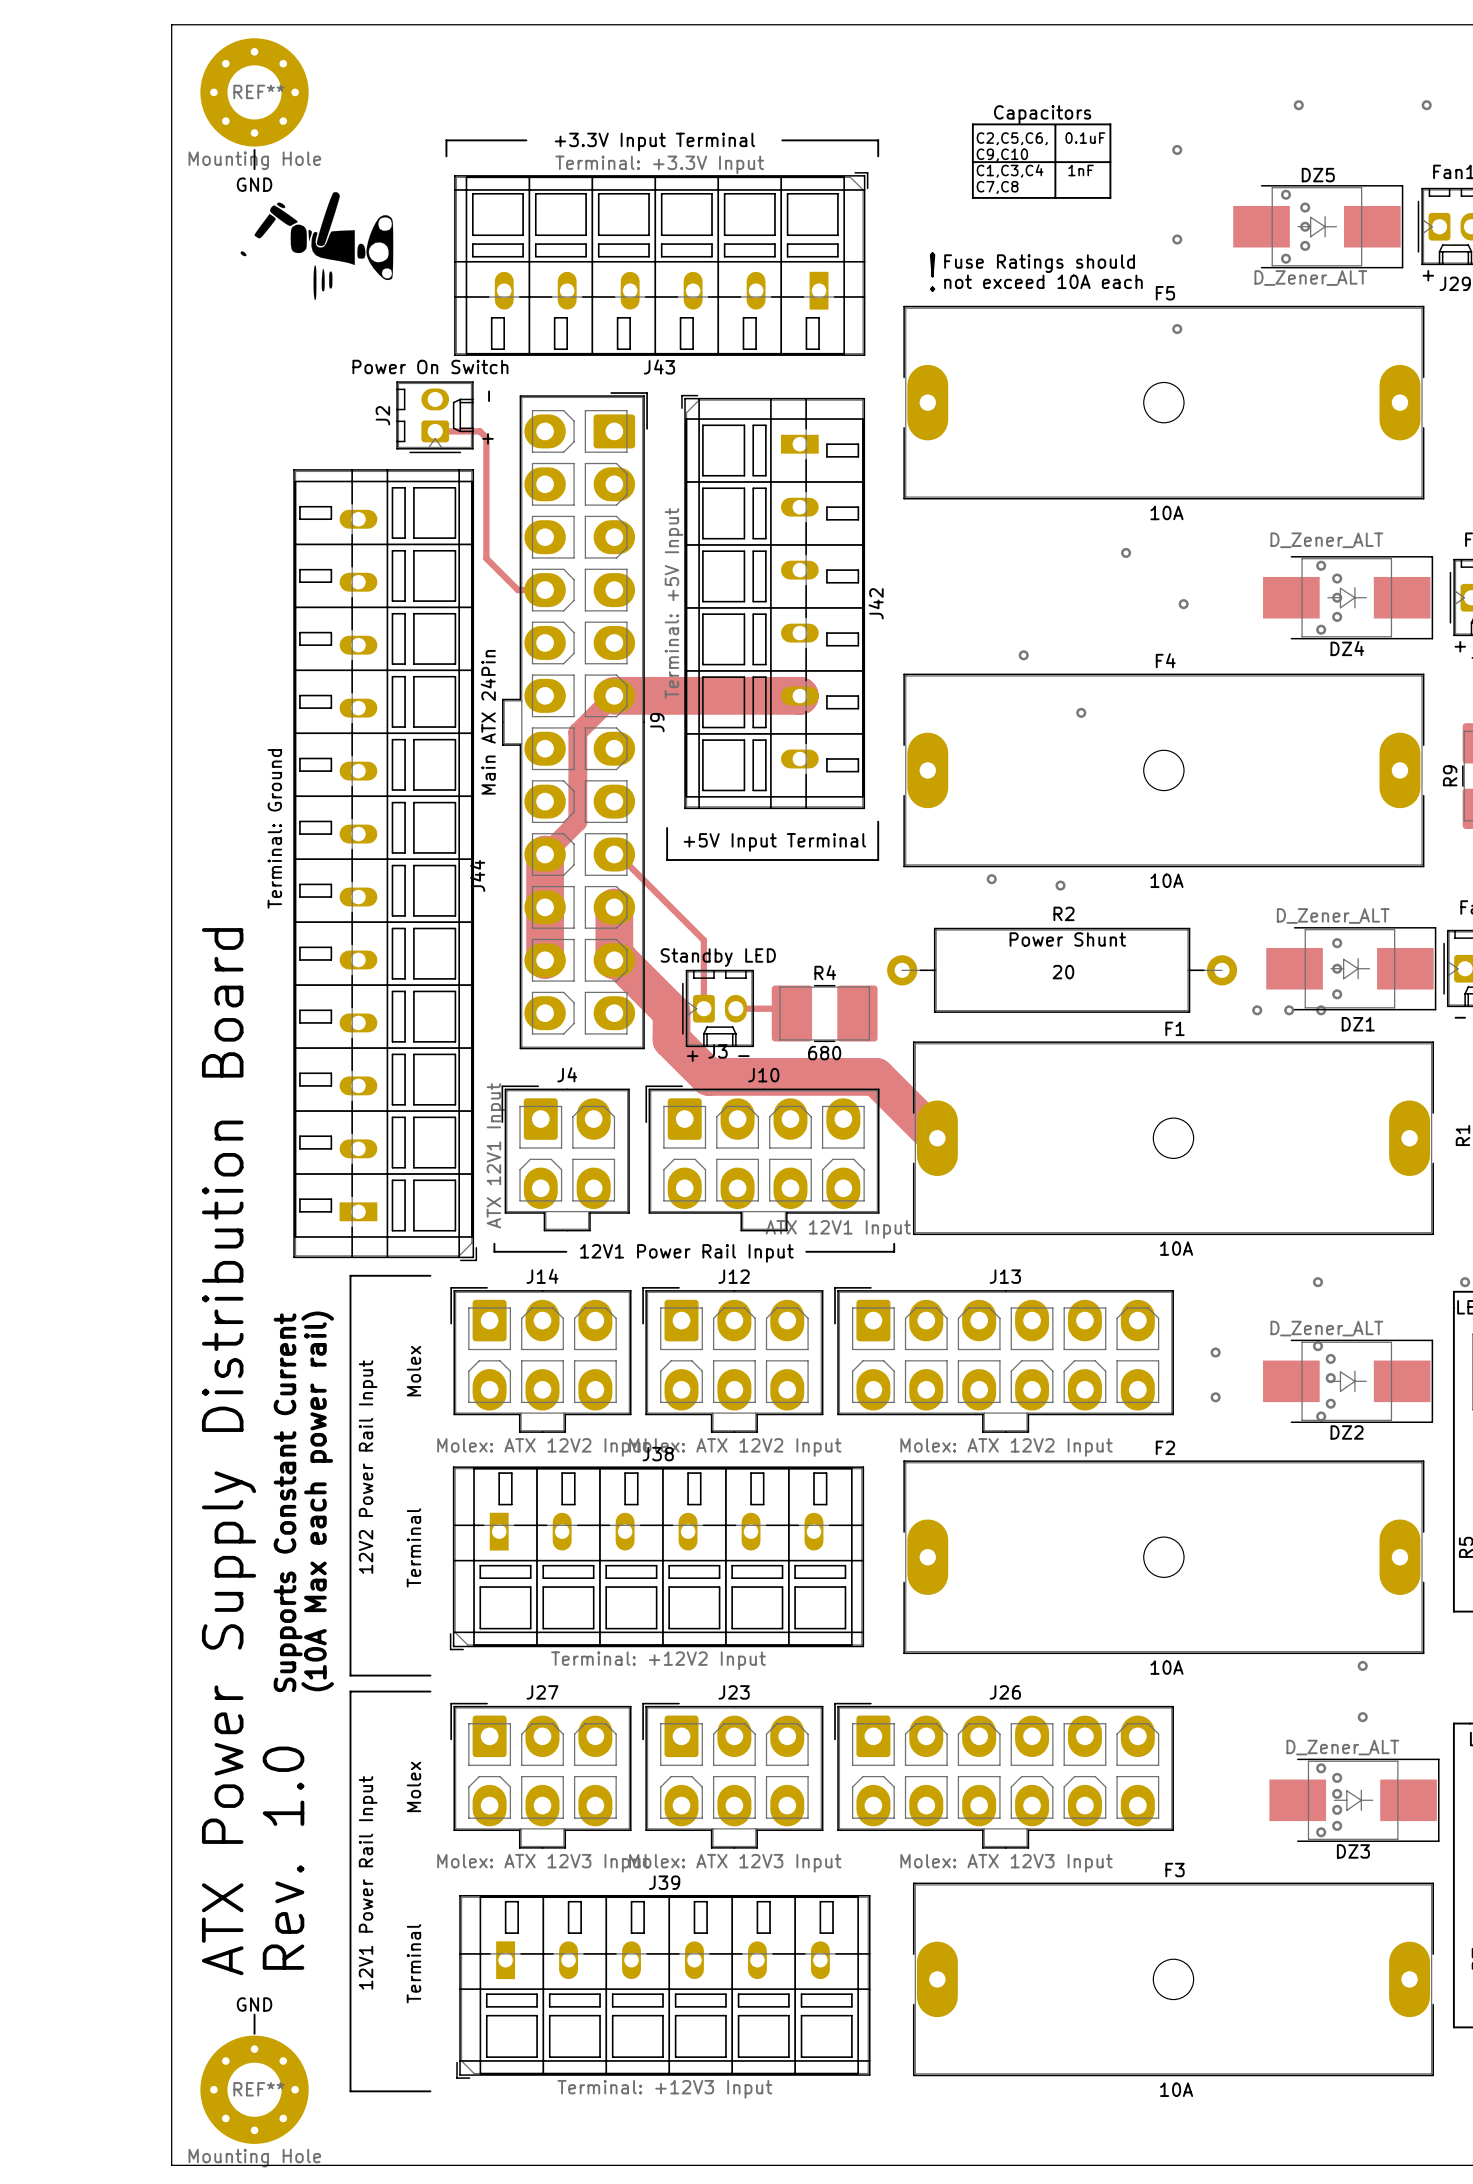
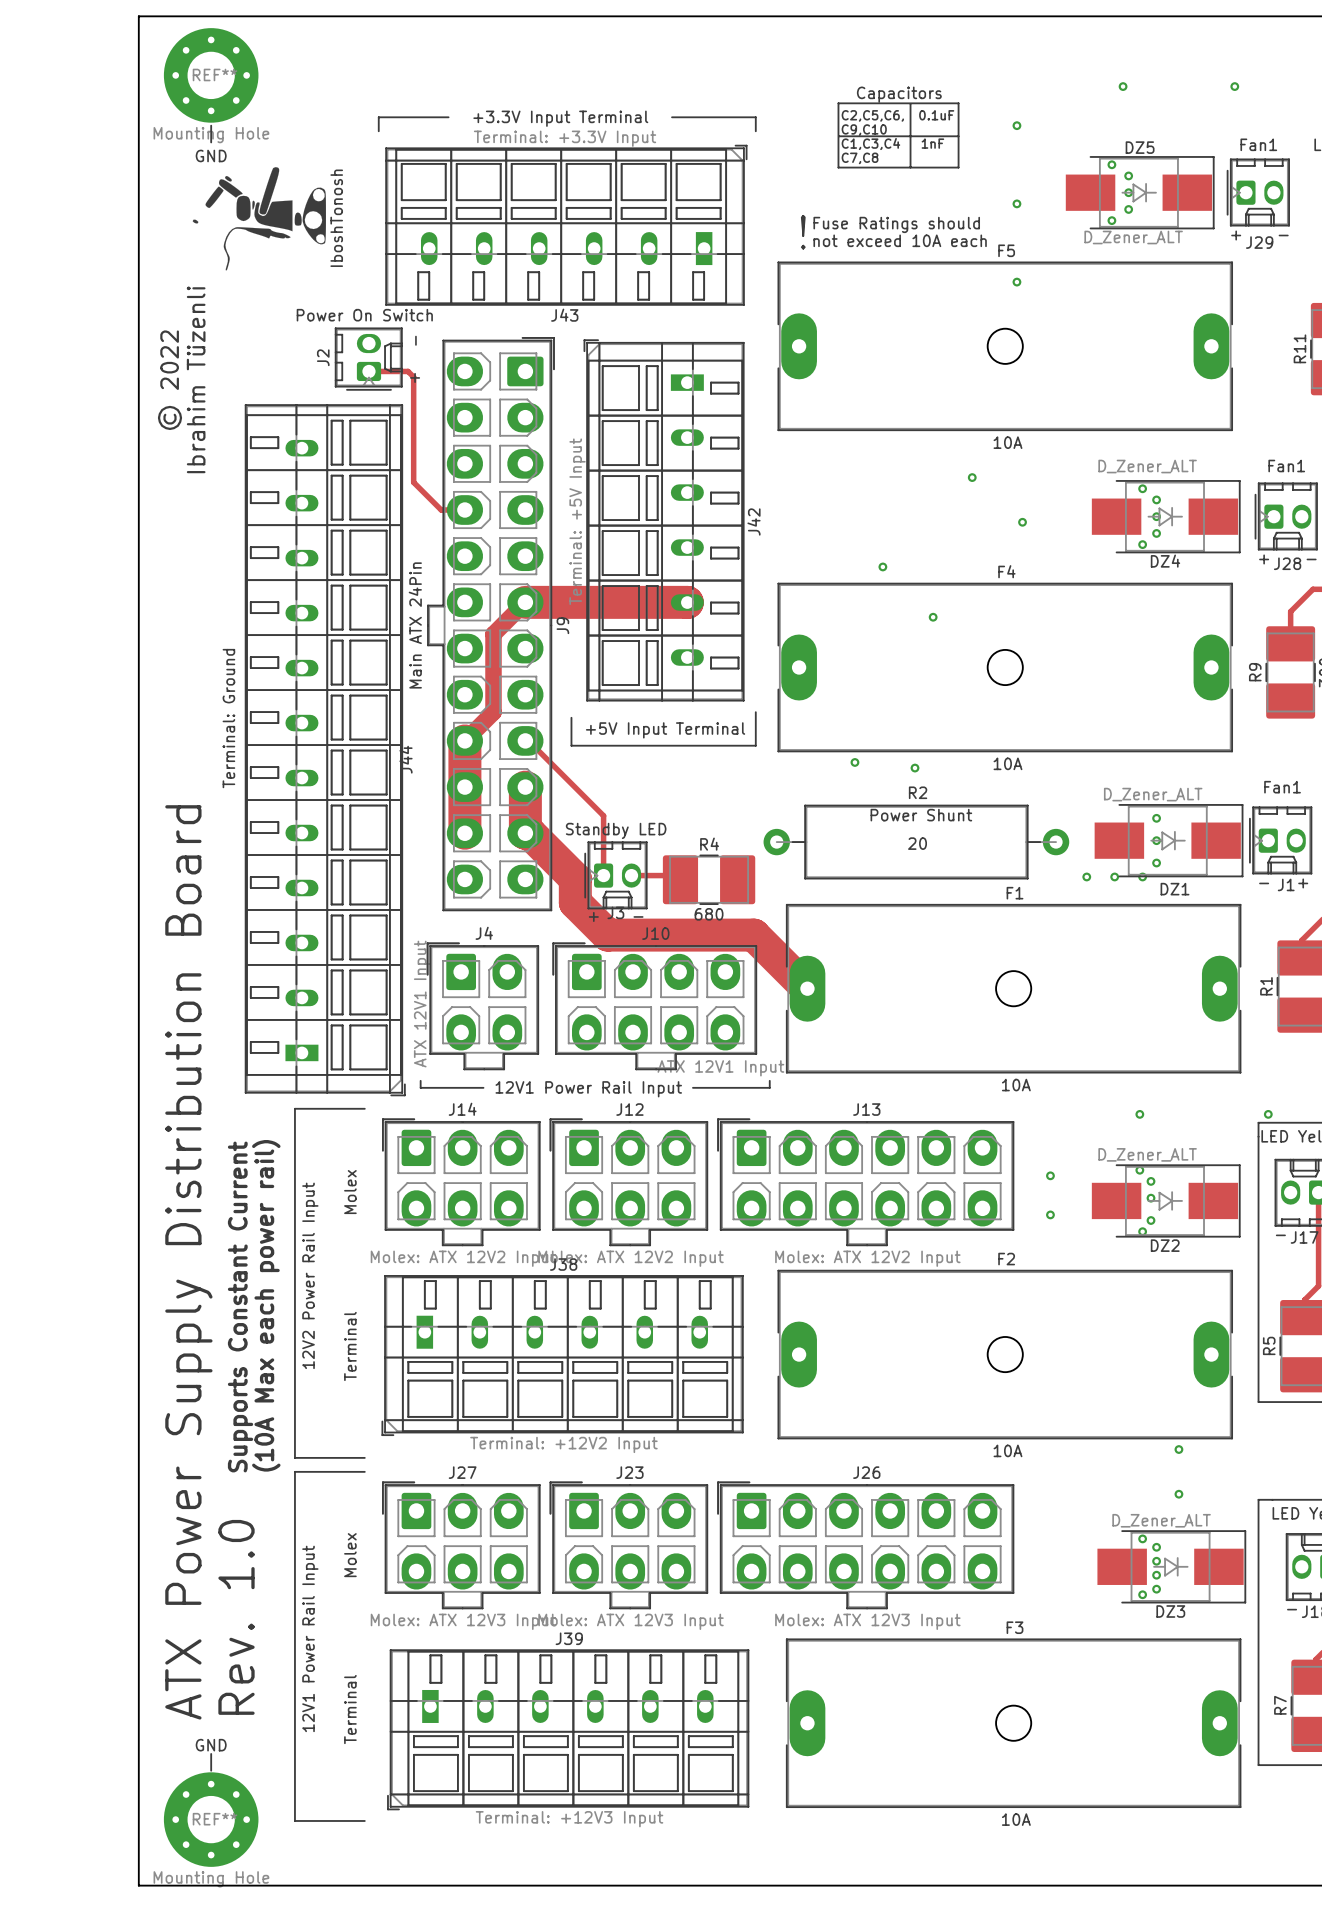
drawing: [240, 192, 394, 301] -> none
drawing: none -> [192, 167, 327, 271]
text: none -> © 2022 (170, 380)
text: none -> Ibrahim Tüzenli (196, 379)

